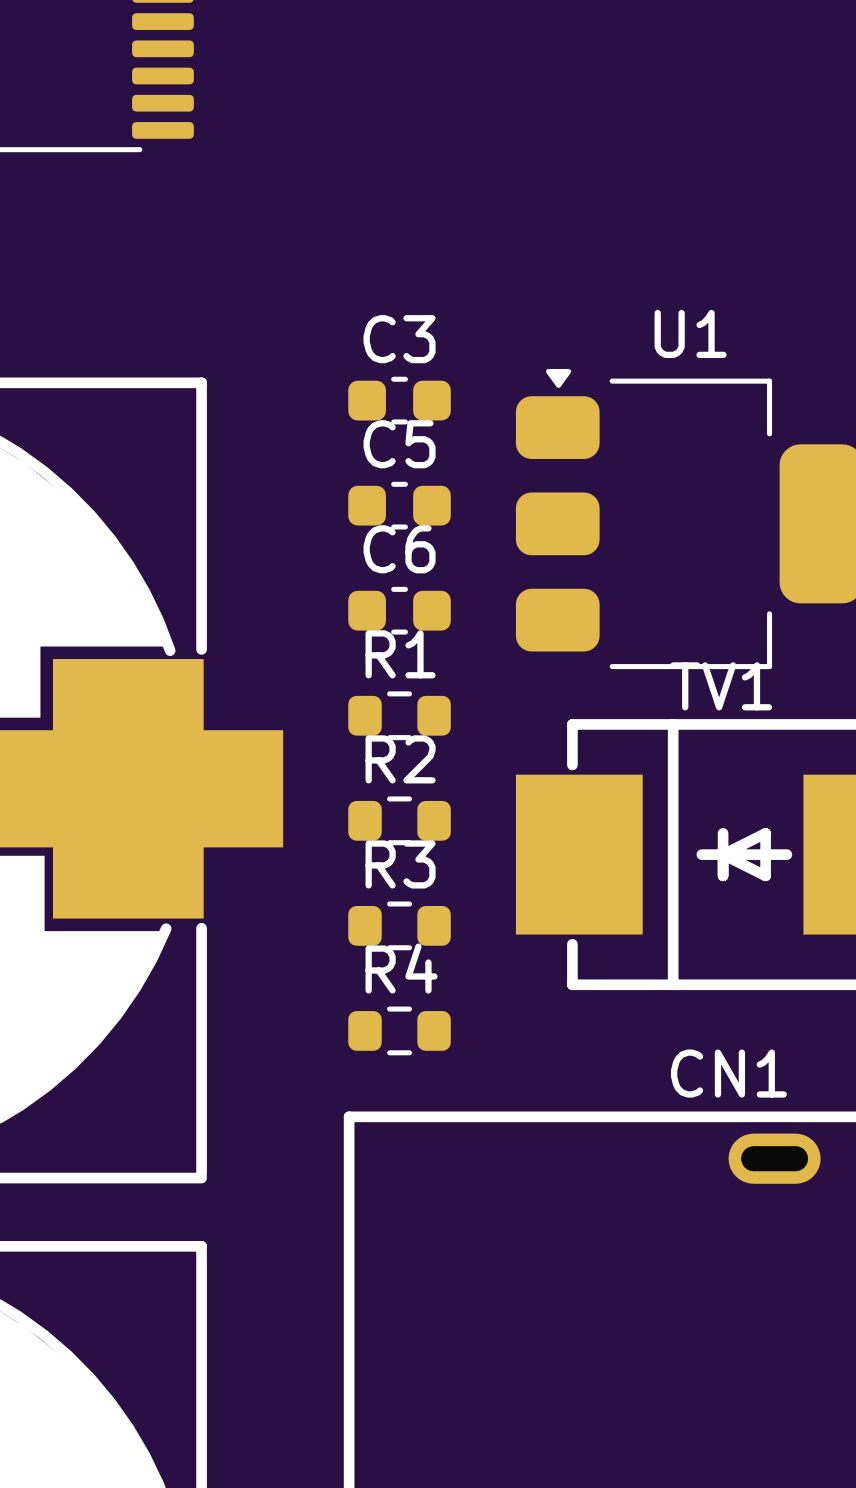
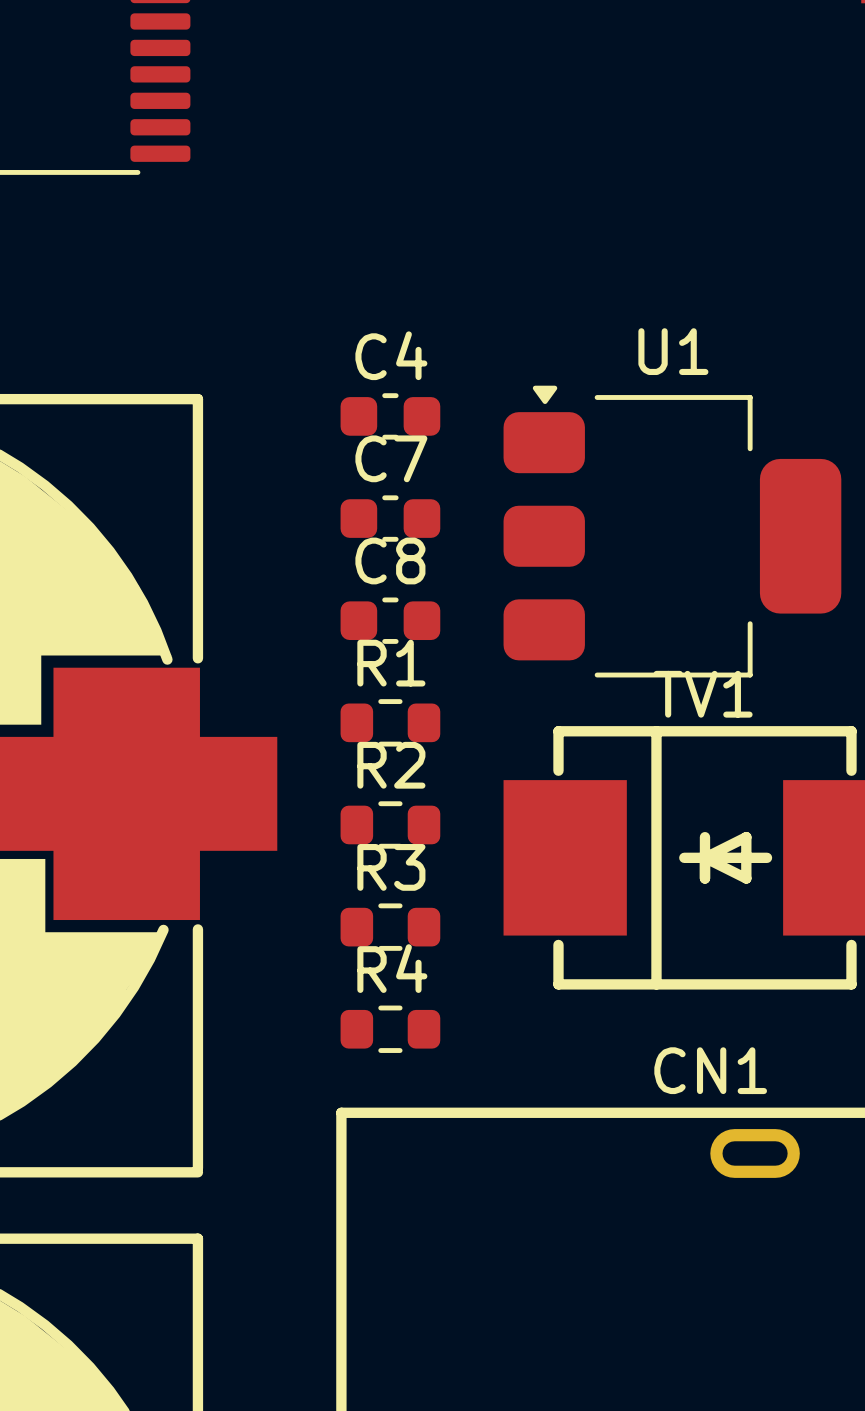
C3 name: C3 (399, 339) -> C4 (391, 355)
C5 name: C5 (399, 444) -> C7 (391, 458)
C6 name: C6 (399, 549) -> C8 (390, 560)

